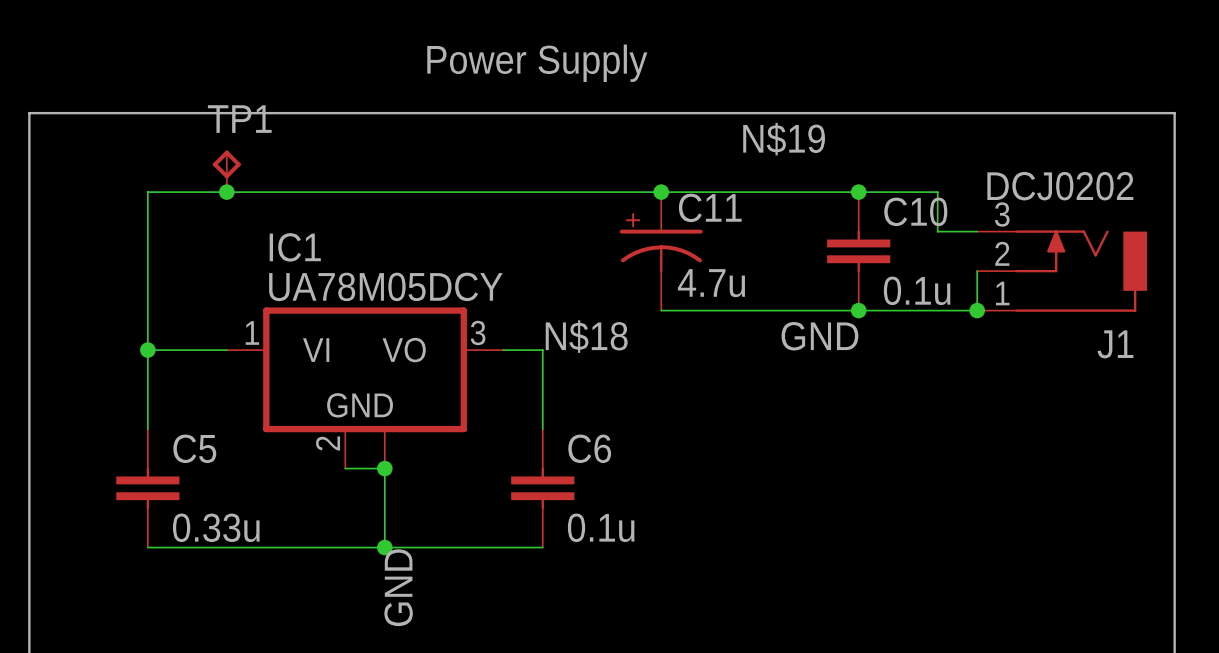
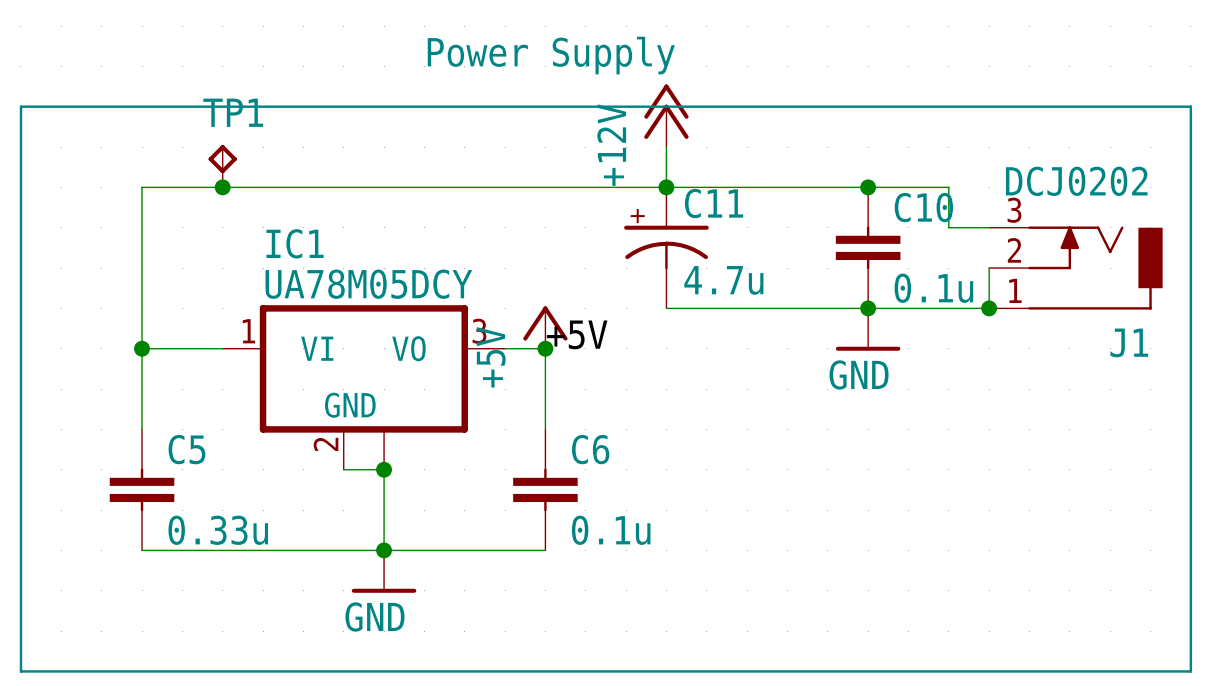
power symbol: none -> +12V (666, 115)
label: N$19 (784, 139) -> none
wire: none -> (666, 147) (666, 187)
power symbol: none -> +5V (545, 327)
power symbol: none -> GND (868, 329)
label: N$18 (586, 336) -> +5V (577, 334)
label: GND (819, 336) -> none
junction: none -> (545, 348)
power symbol: none -> GND (384, 571)
label: GND (398, 587) -> none

